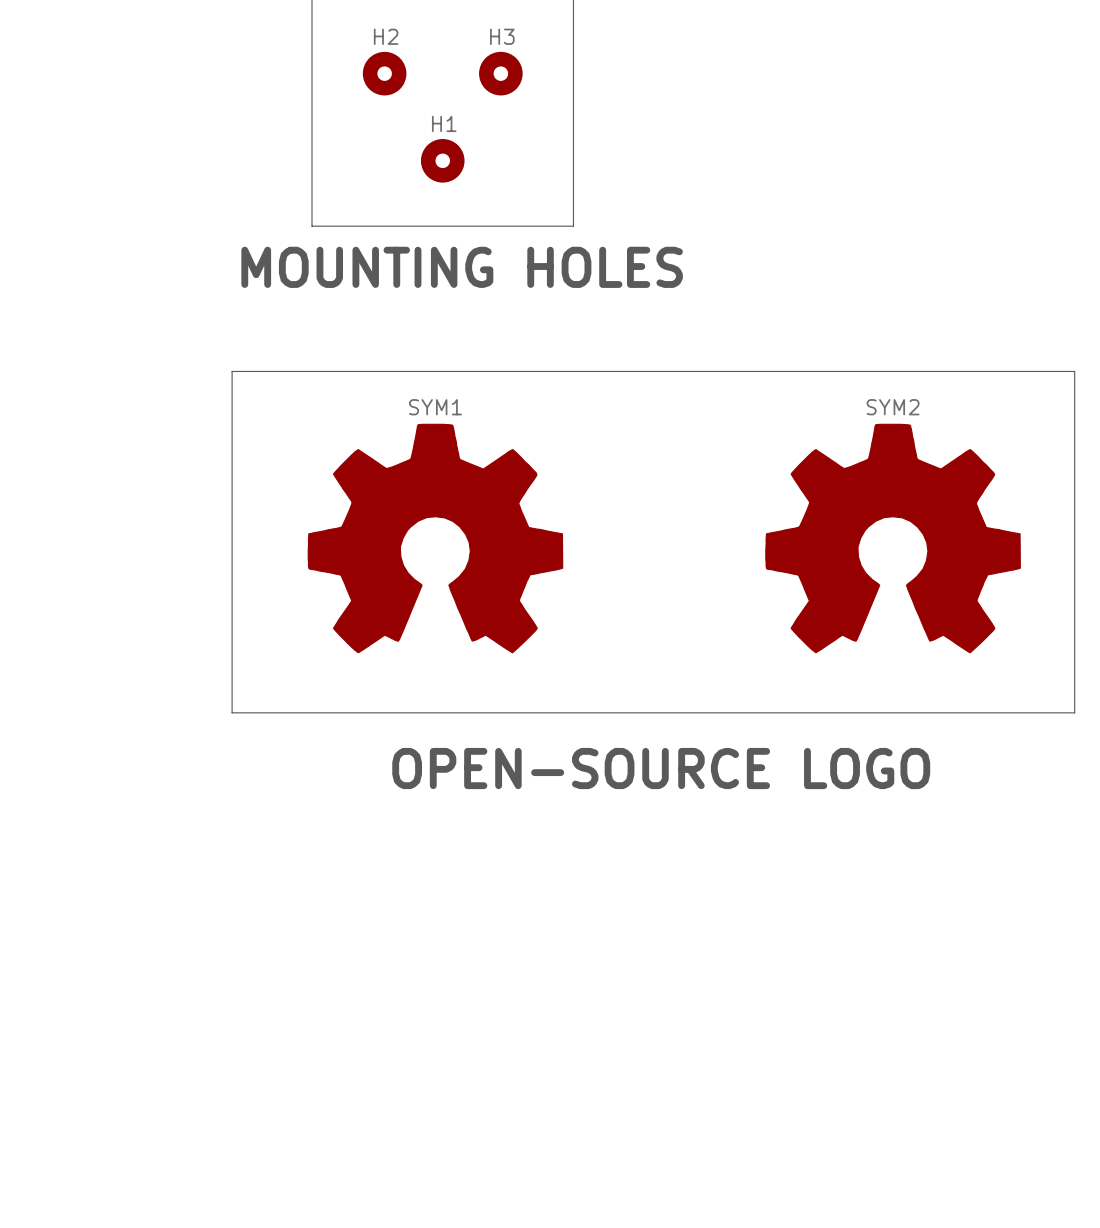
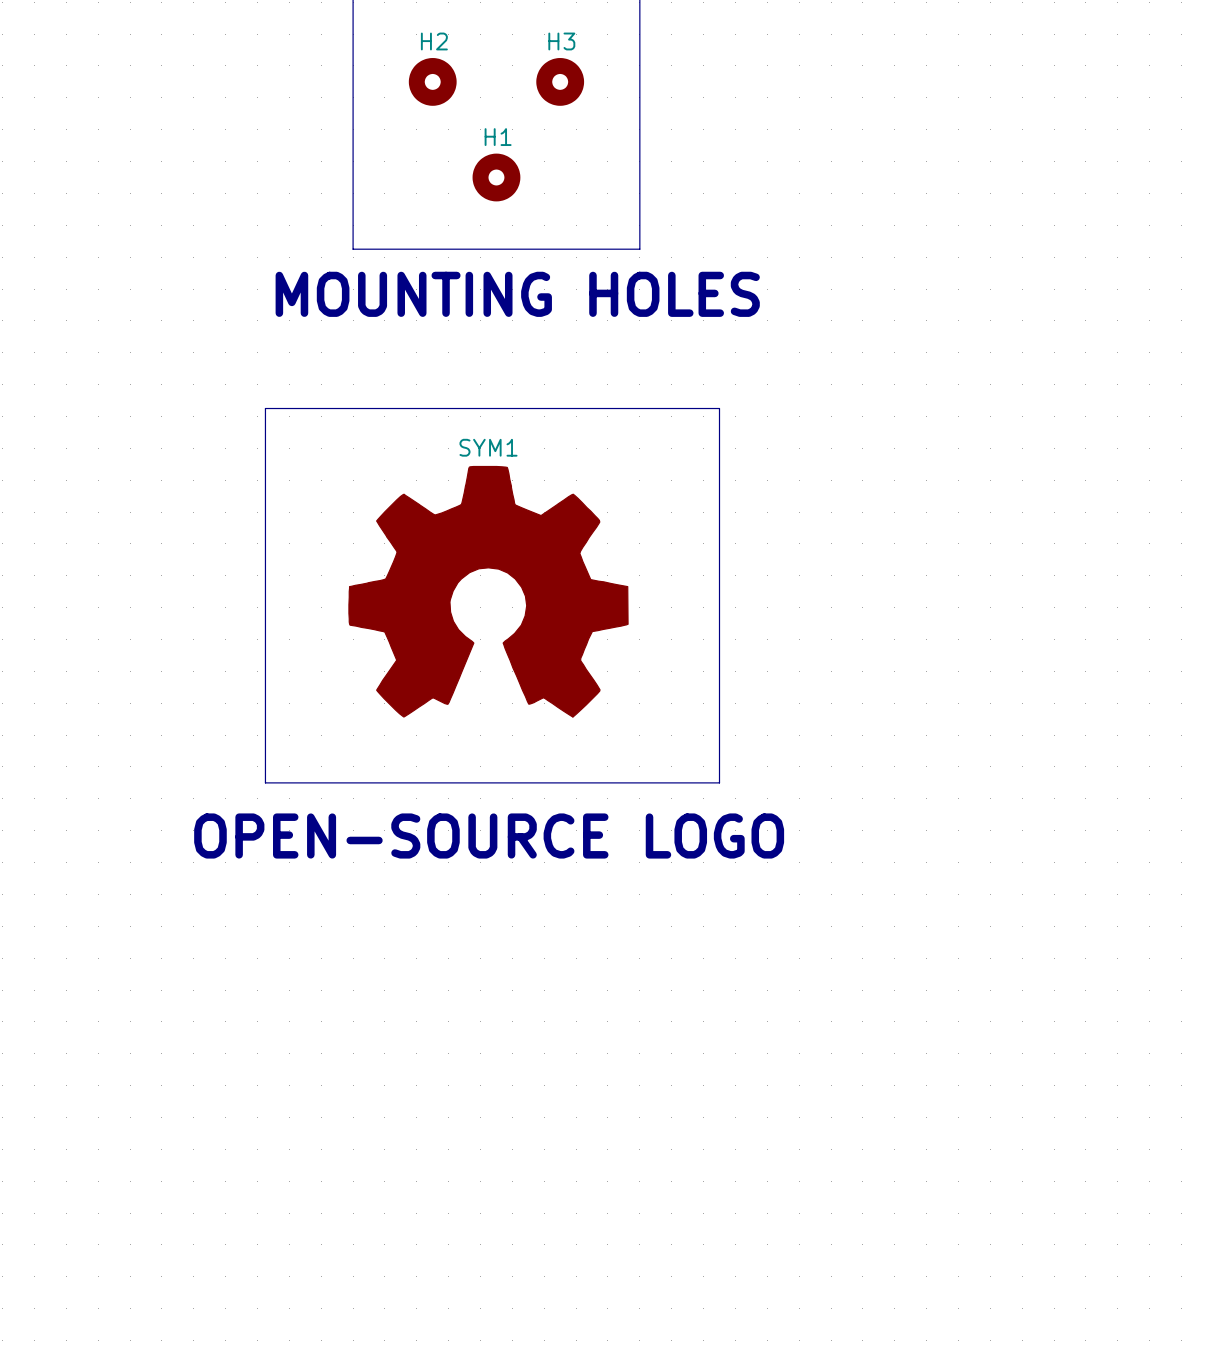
bus: (646, 371) (1074, 371) (1074, 712) (646, 712) -> (719, 408) (719, 782)
SYM2: (893, 538) -> none
text position: OPEN-SOURCE LOGO (661, 768) -> OPEN-SOURCE LOGO (489, 836)

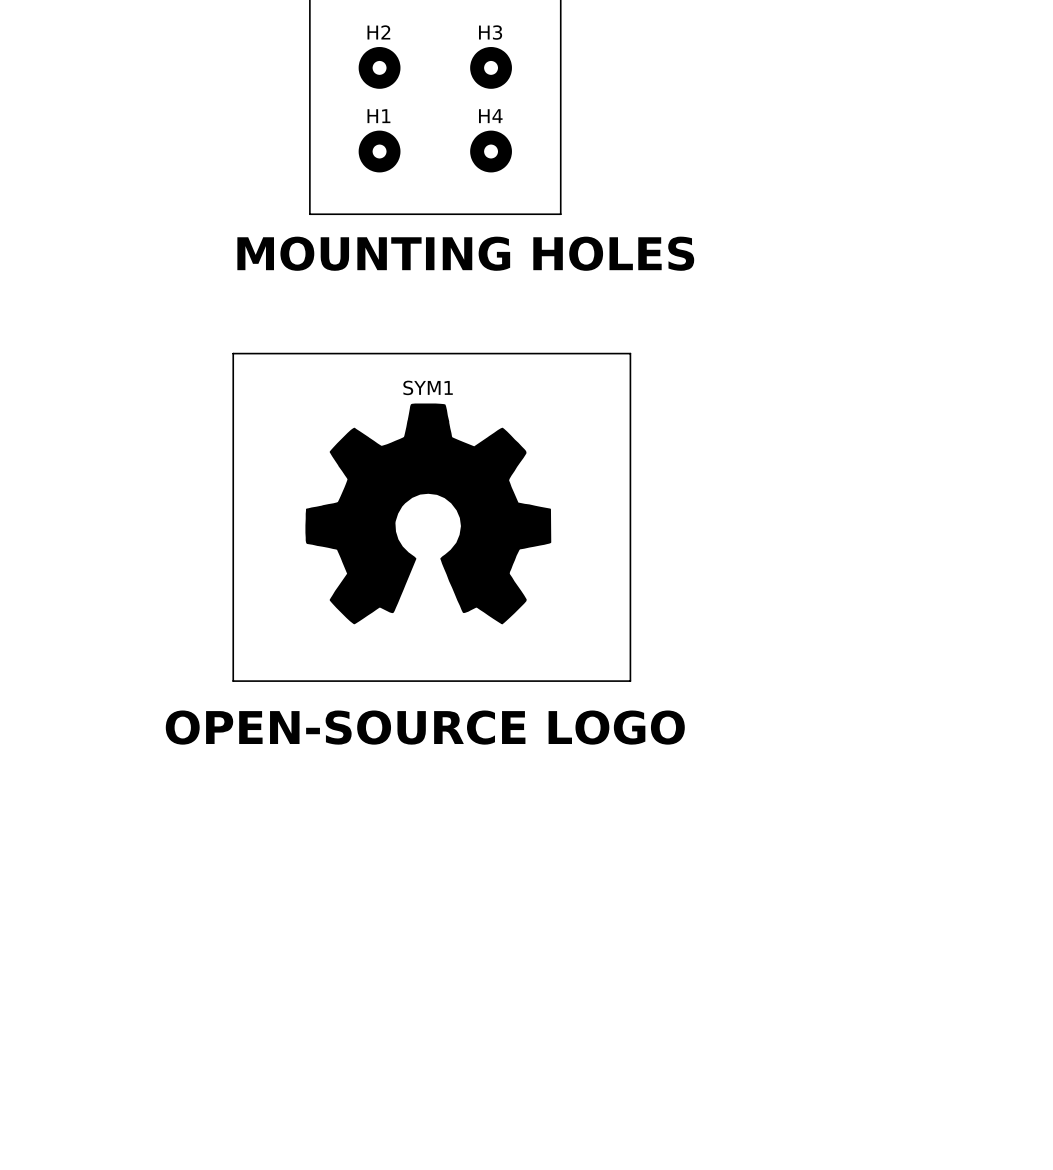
H1 position: (496, 177) -> (379, 151)
H4: none -> (491, 151)

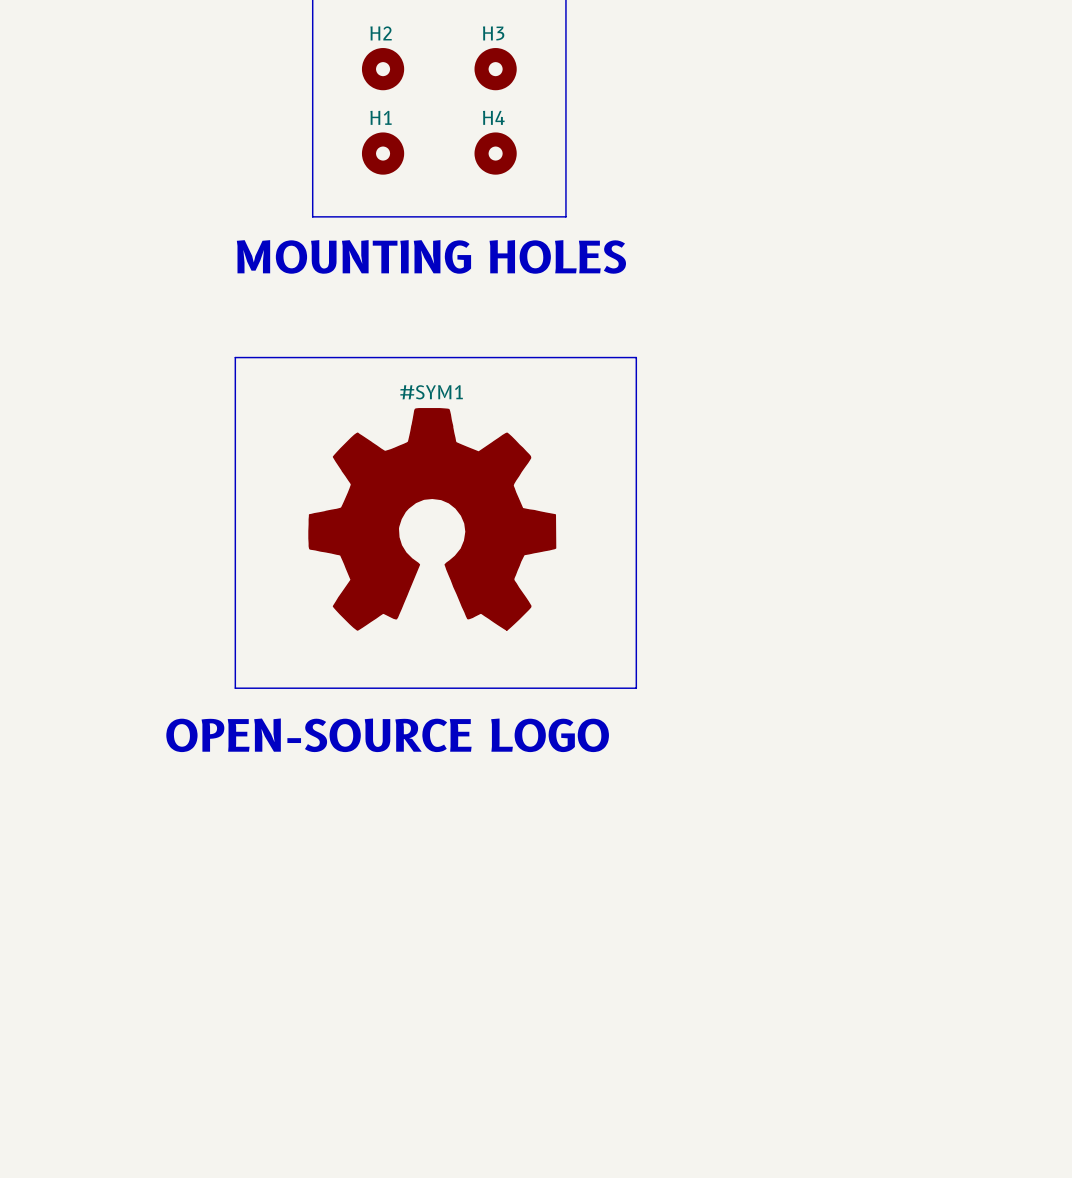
SYM1: (428, 513) -> none
#SYM1: none -> (432, 519)

